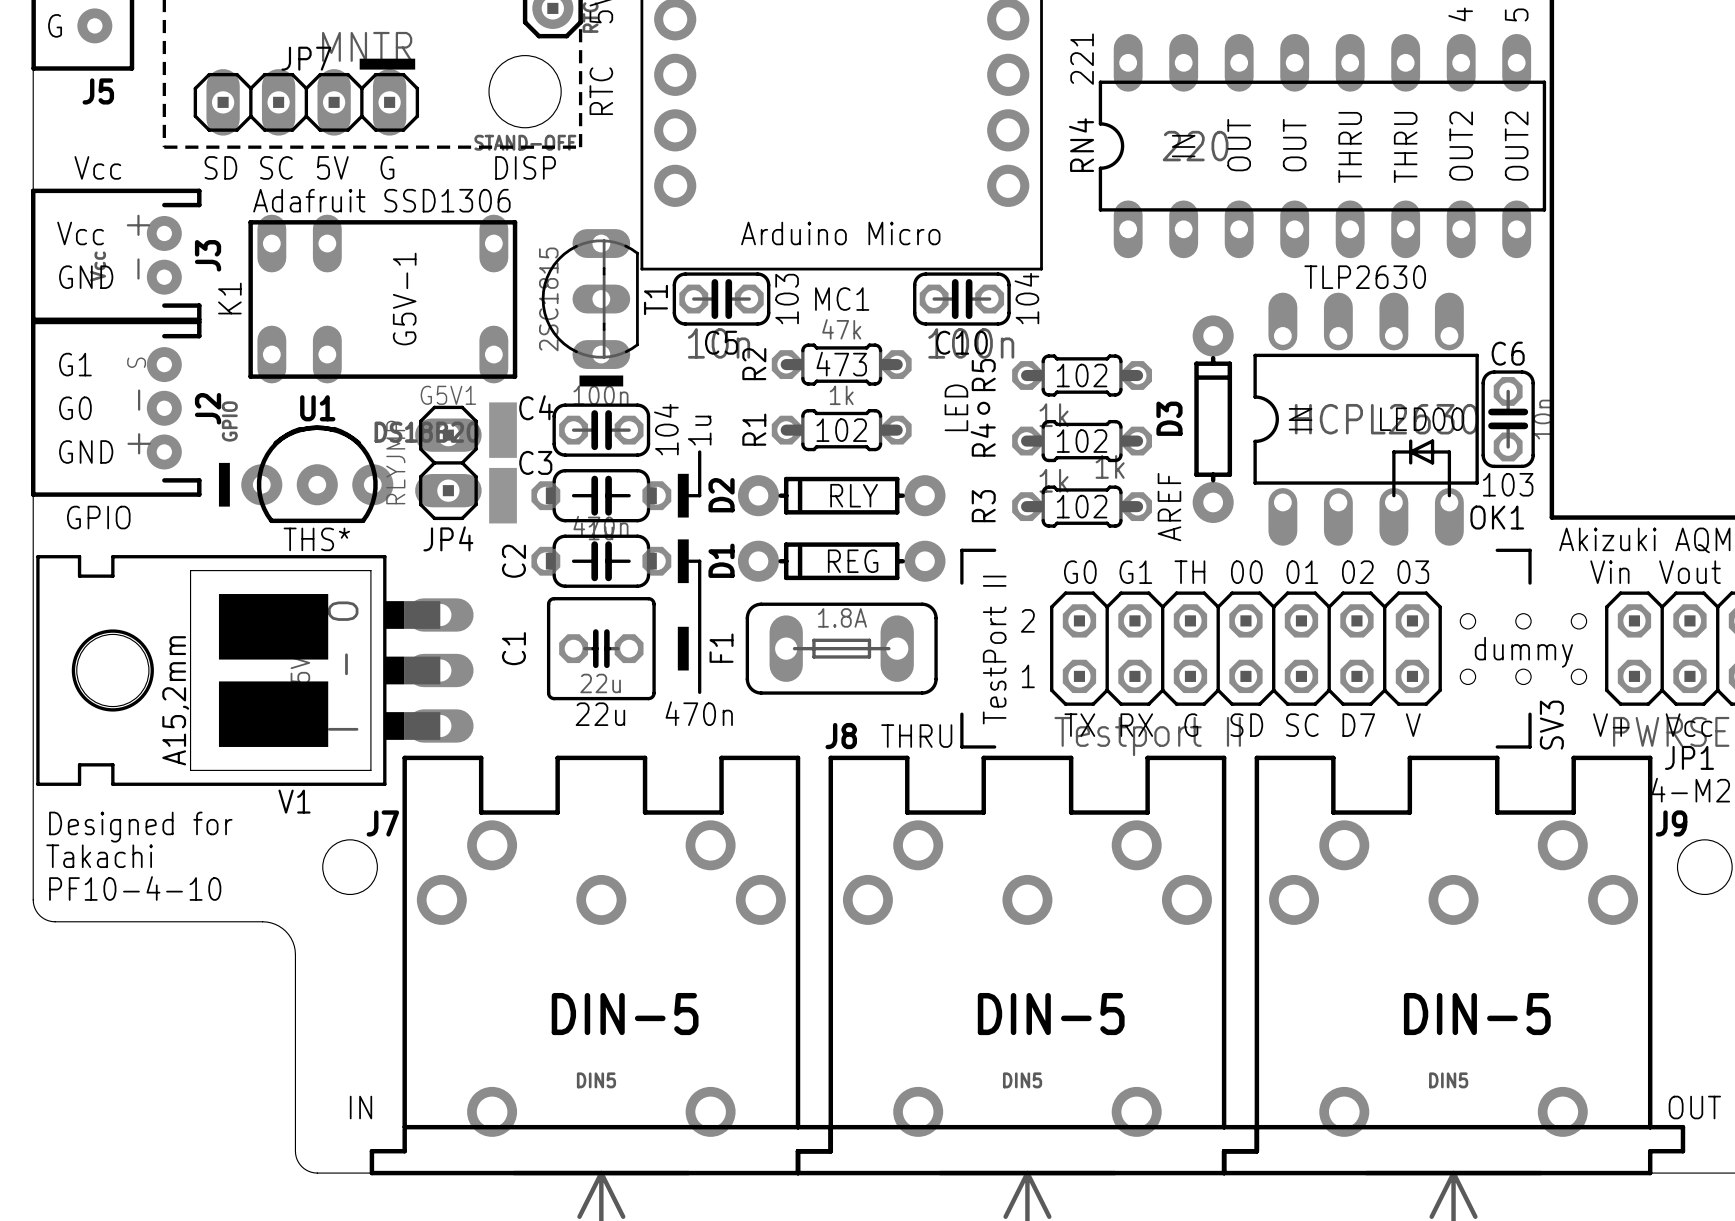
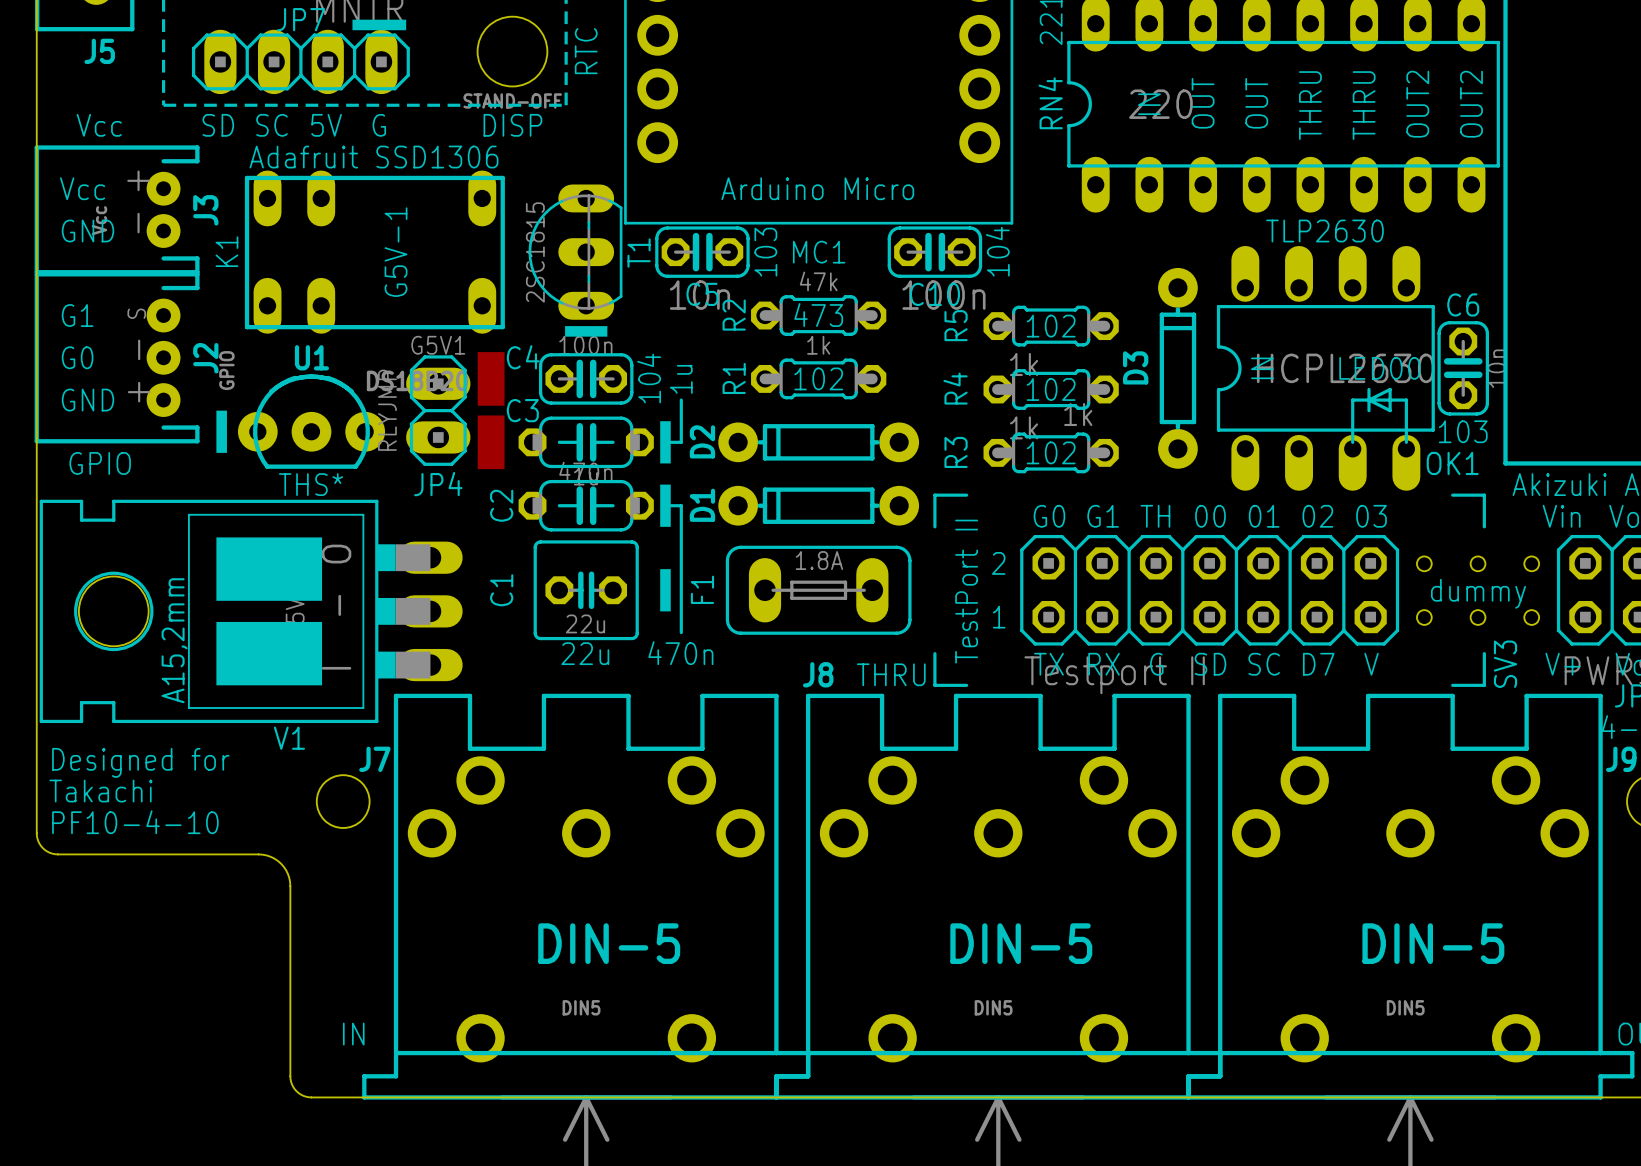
drawing: [977, 401, 991, 415] -> none
text: LED (956, 407) -> none
text: RLY (854, 495) -> none
text: AREF (1169, 507) -> none
text: REG (853, 561) -> none

